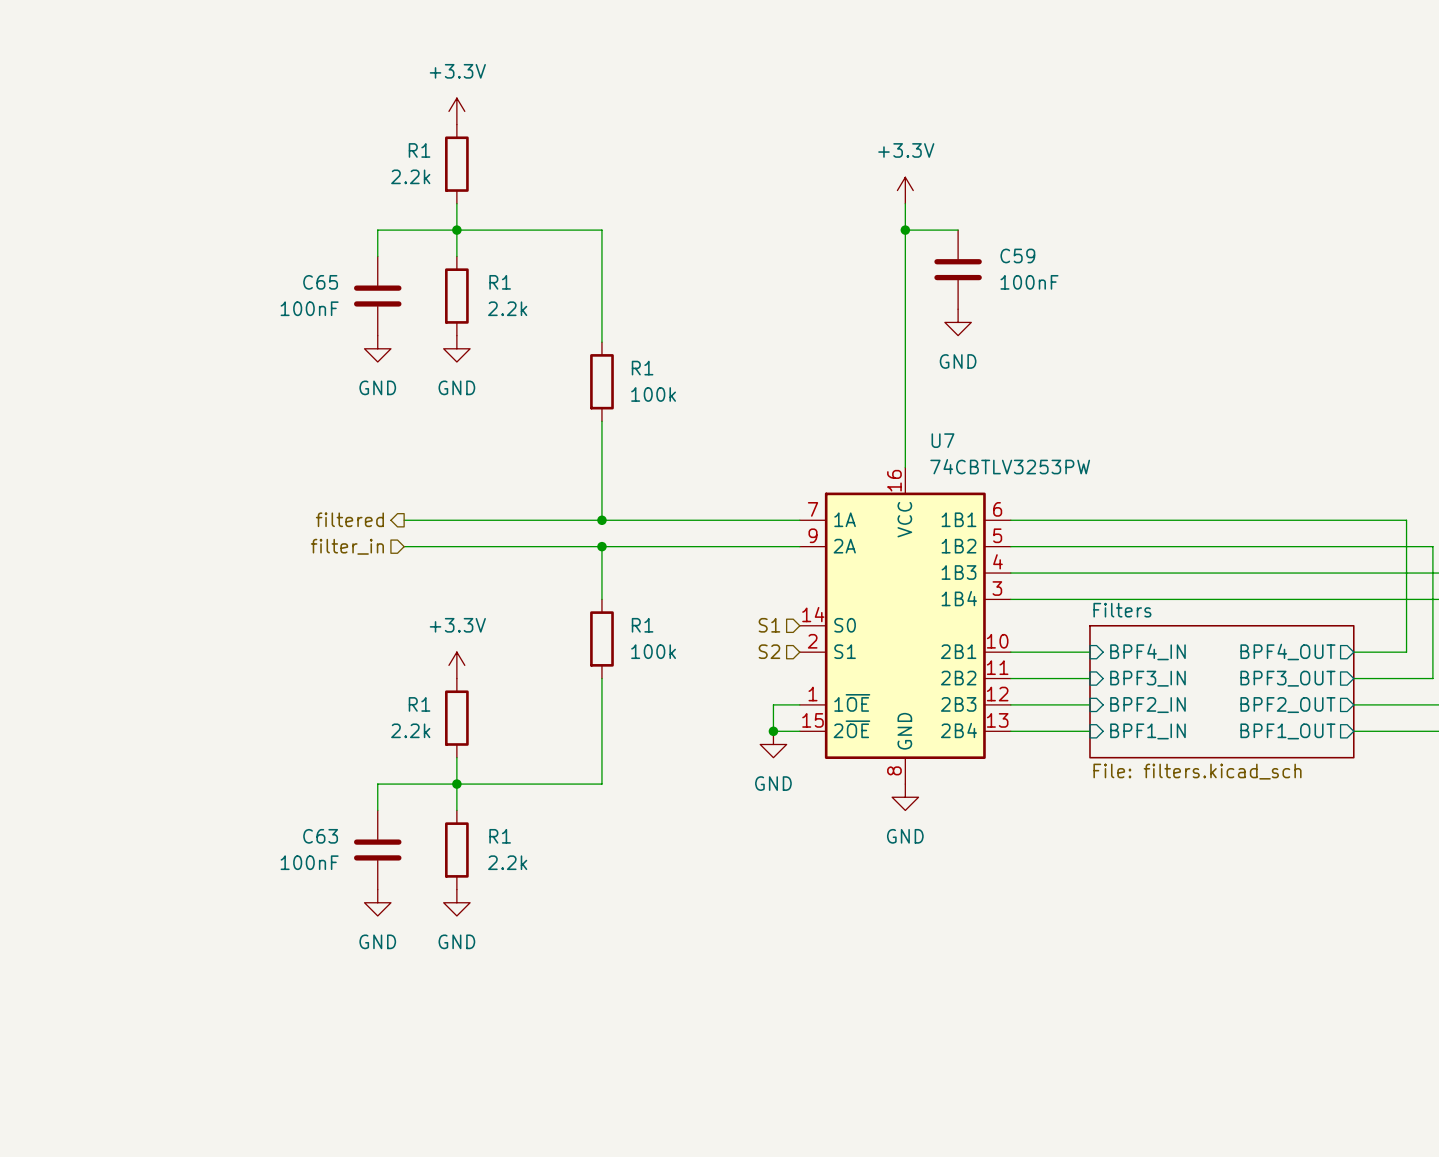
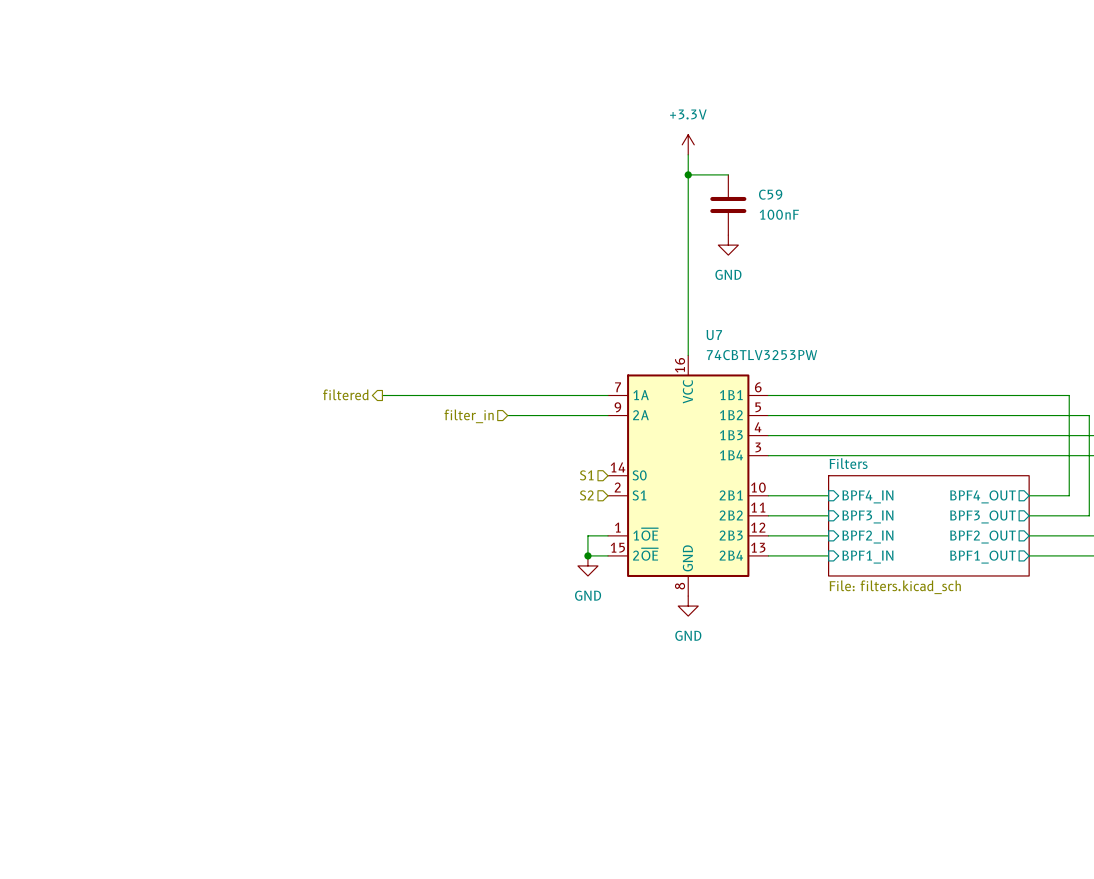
power symbol: +3.3V (456, 111) -> none
R1: 2.2k (456, 164) -> none
wire: (456, 203) (456, 256) -> none
junction: (456, 230) -> none
wire: (377, 256) (377, 230) (601, 230) (601, 342) -> none
C65: 100nF (377, 296) -> none
R1: 2.2k (456, 296) -> none
power symbol: GND (377, 348) -> none
power symbol: GND (456, 348) -> none
R1: 100k (601, 381) -> none
wire: (601, 421) (601, 520) -> none
hierarchical label position: filtered (349, 519) -> filtered (345, 394)
wire: (404, 520) (503, 520) -> none
junction: (601, 520) -> none
hierarchical label: filter_in (347, 546) -> none
wire: (404, 546) (667, 546) -> none
wire: (601, 546) (601, 599) -> none
junction: (601, 546) -> none
hierarchical label: none -> filter_in (469, 416)
R1: 100k (601, 638) -> none
power symbol: +3.3V (456, 665) -> none
wire: (601, 678) (601, 784) (377, 784) (377, 810) -> none
R1: 2.2k (456, 718) -> none
wire: (456, 757) (456, 810) -> none
junction: (456, 784) -> none
C63: 100nF (377, 850) -> none
R1: 2.2k (456, 850) -> none
power symbol: GND (377, 902) -> none
power symbol: GND (456, 902) -> none

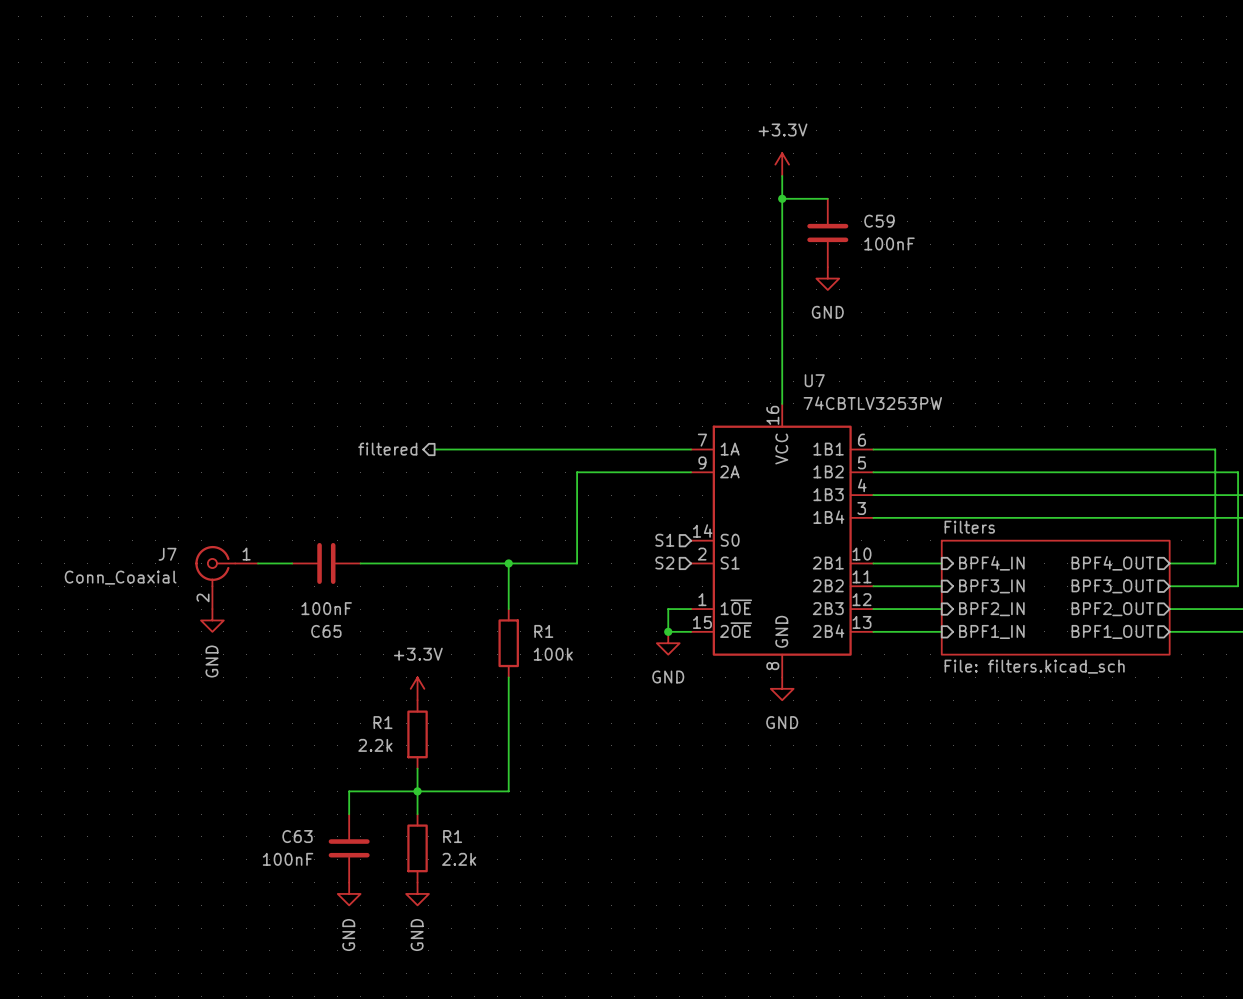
wire: none -> (577, 472) (577, 563) (360, 563)
hierarchical label: filter_in (469, 416) -> none
wire: none -> (258, 563) (292, 563)
C65: none -> 100nF (326, 563)
wire: none -> (508, 563) (508, 609)
junction: none -> (508, 563)
J7: none -> Conn_Coaxial (226, 577)
power symbol: none -> GND (212, 620)
R1: none -> 100k (508, 643)
wire: none -> (508, 677) (508, 791) (349, 791) (349, 814)
power symbol: none -> +3.3V (417, 688)
R1: none -> 2.2k (417, 734)
wire: none -> (417, 768) (417, 814)
junction: none -> (417, 791)
C63: none -> 100nF (349, 848)
R1: none -> 2.2k (417, 848)
power symbol: none -> GND (349, 893)
power symbol: none -> GND (417, 893)

